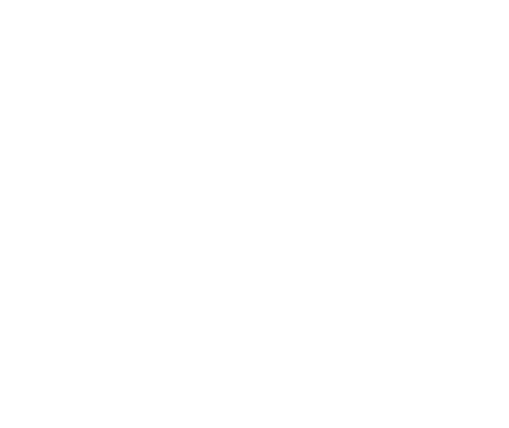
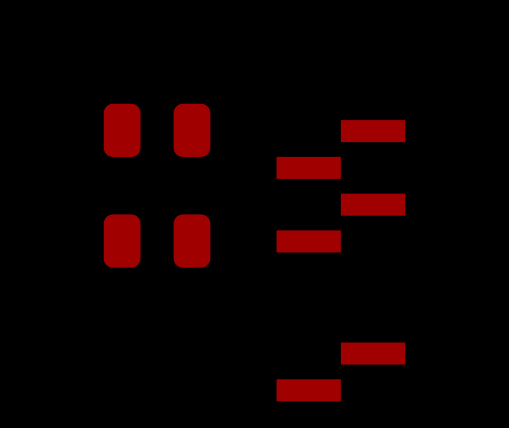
part: none -> (157, 130)
part: none -> (340, 186)
part: none -> (157, 241)
part: none -> (340, 371)

